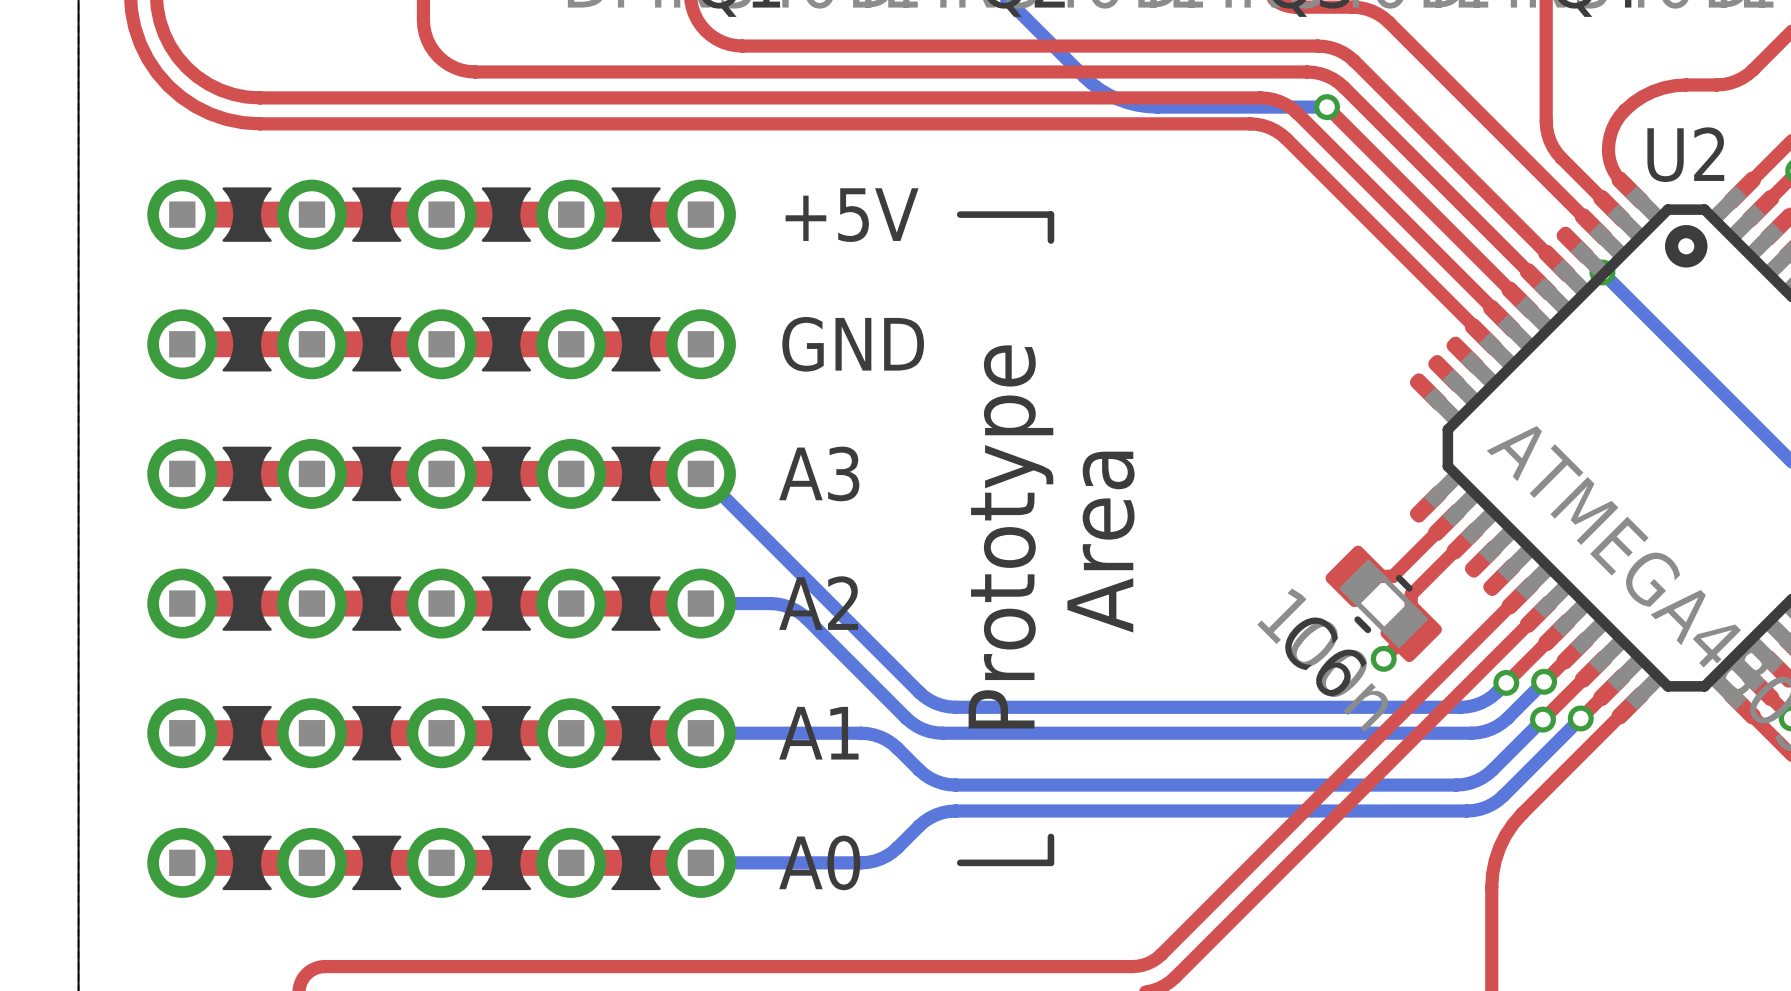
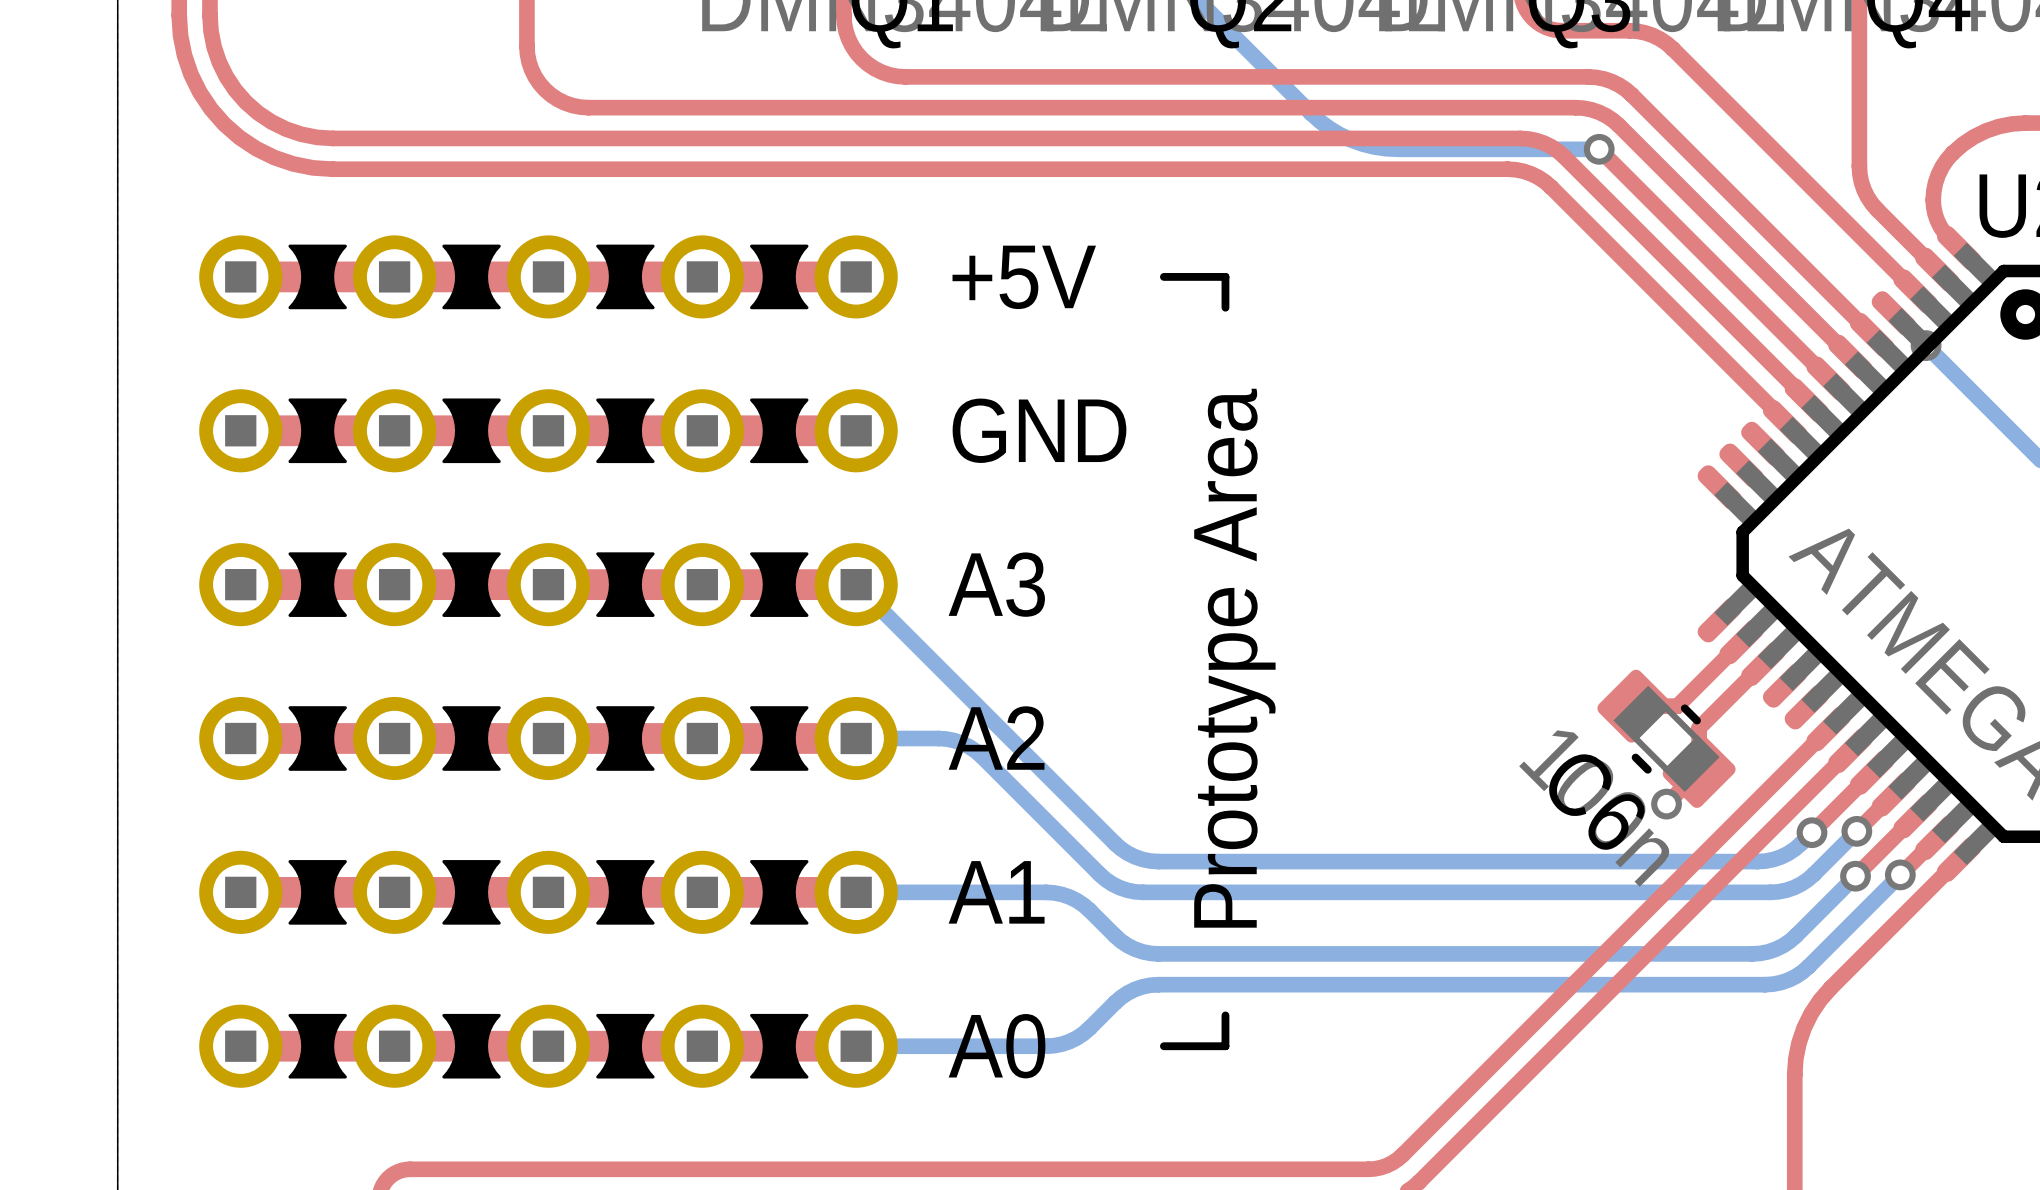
line: (1012, 214) (1050, 214) (1050, 240) -> (1225, 276) (1225, 307)
text: Prototype (1010, 536) -> Prototype Area (1234, 658)
text: Area (1100, 542) -> none
line: (1050, 836) (1050, 862) (1012, 862) -> (1225, 1015) (1225, 1046)

